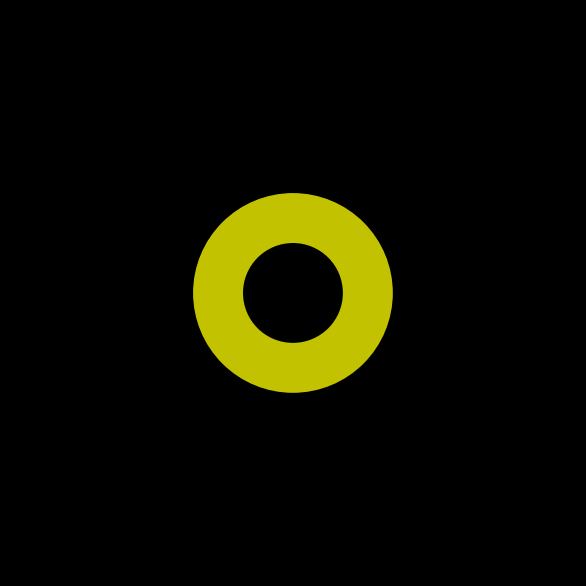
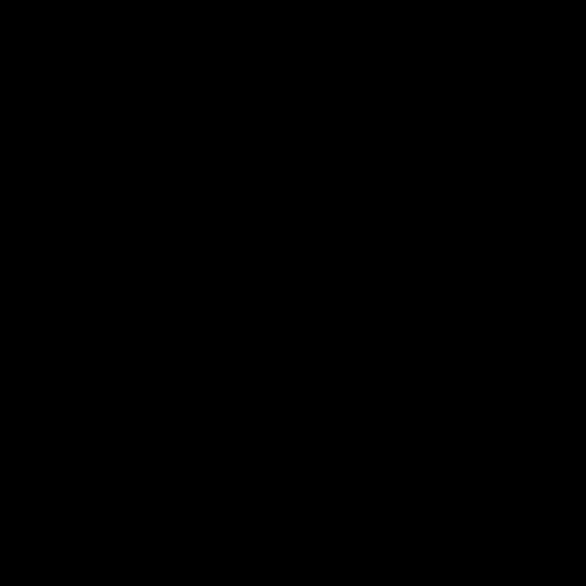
part: (292, 292) -> none

